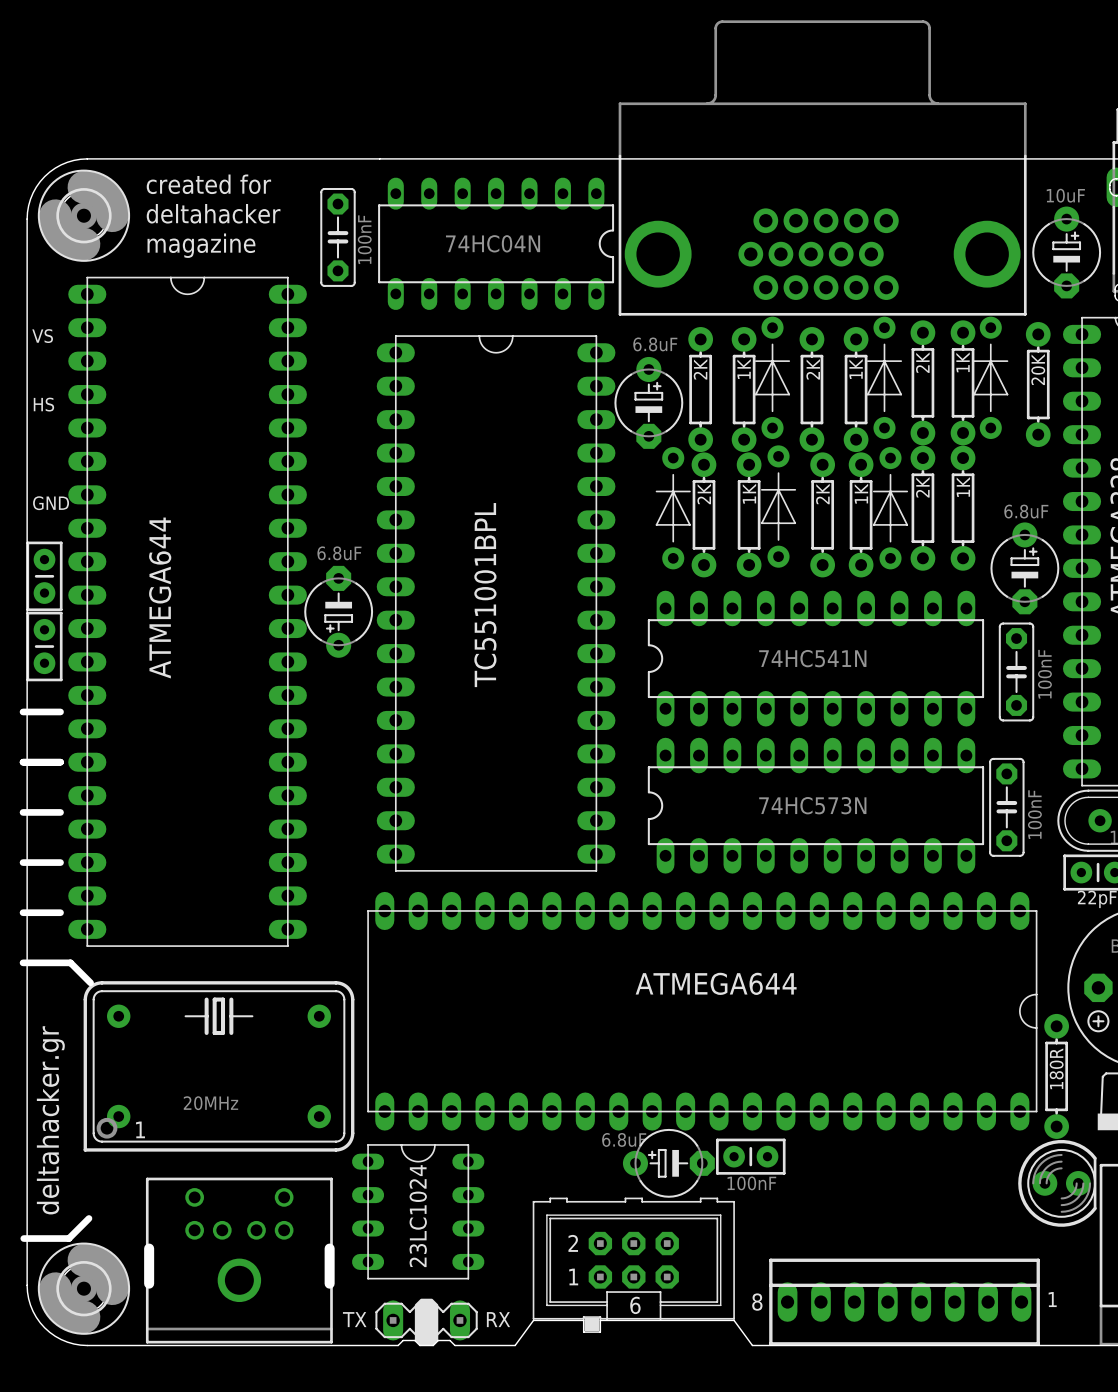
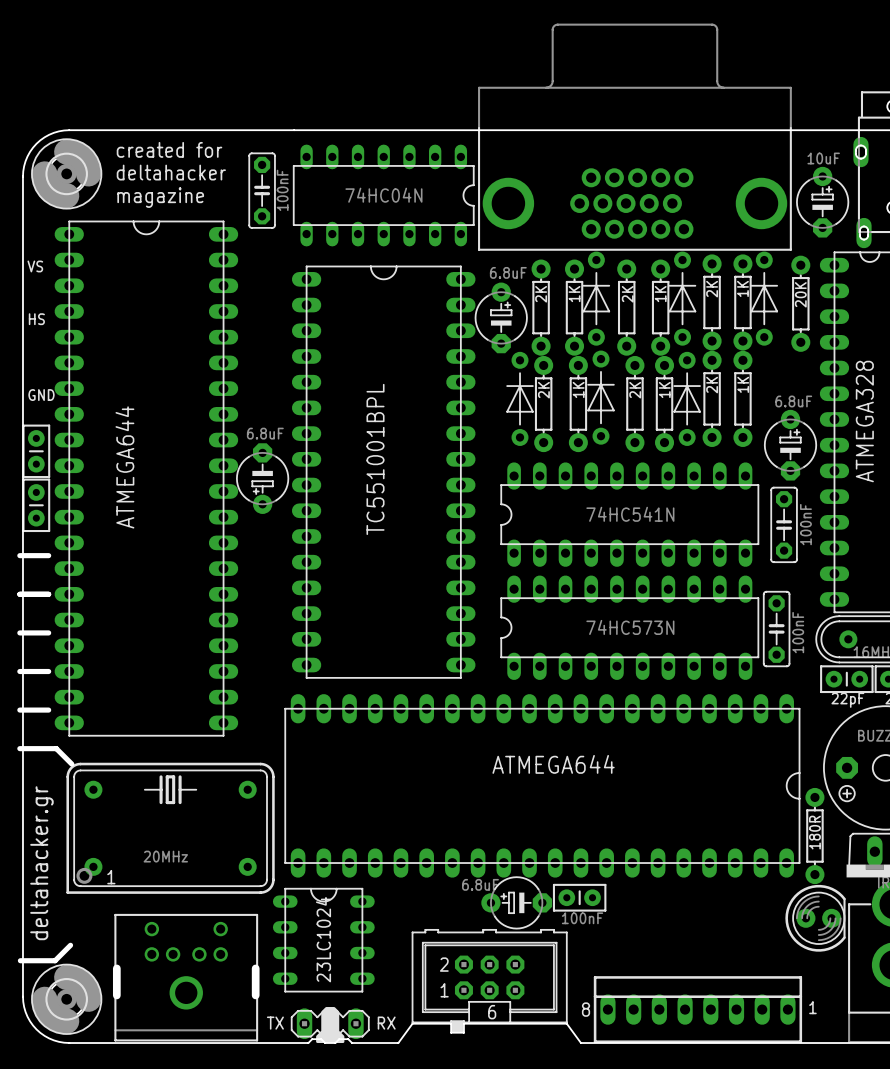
drawing shape: [414, 1298, 439, 1346] -> [316, 1007, 345, 1044]

